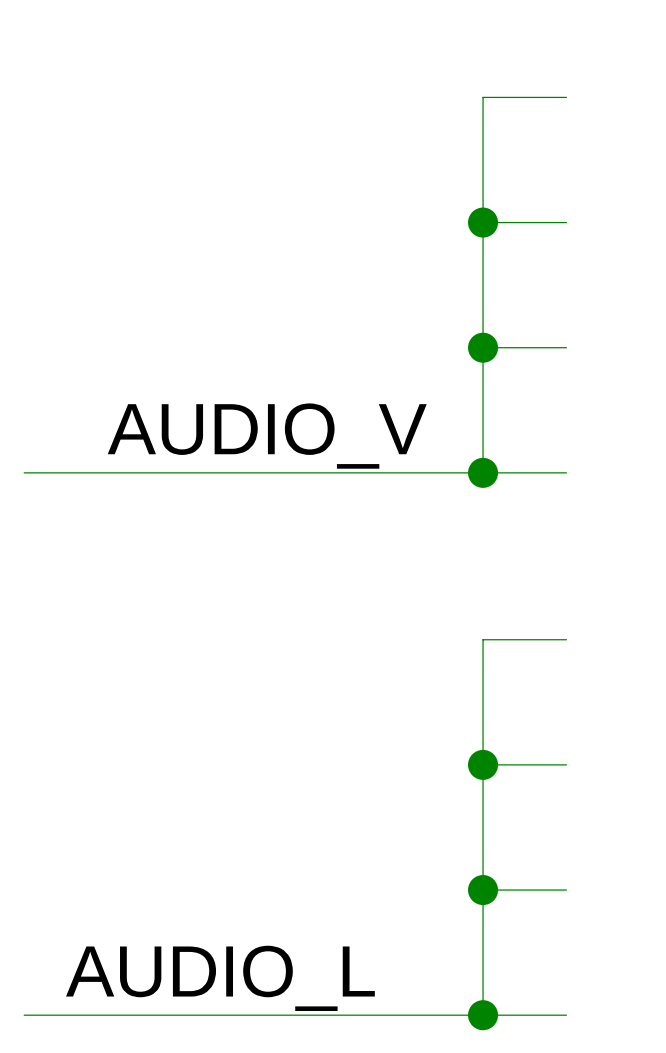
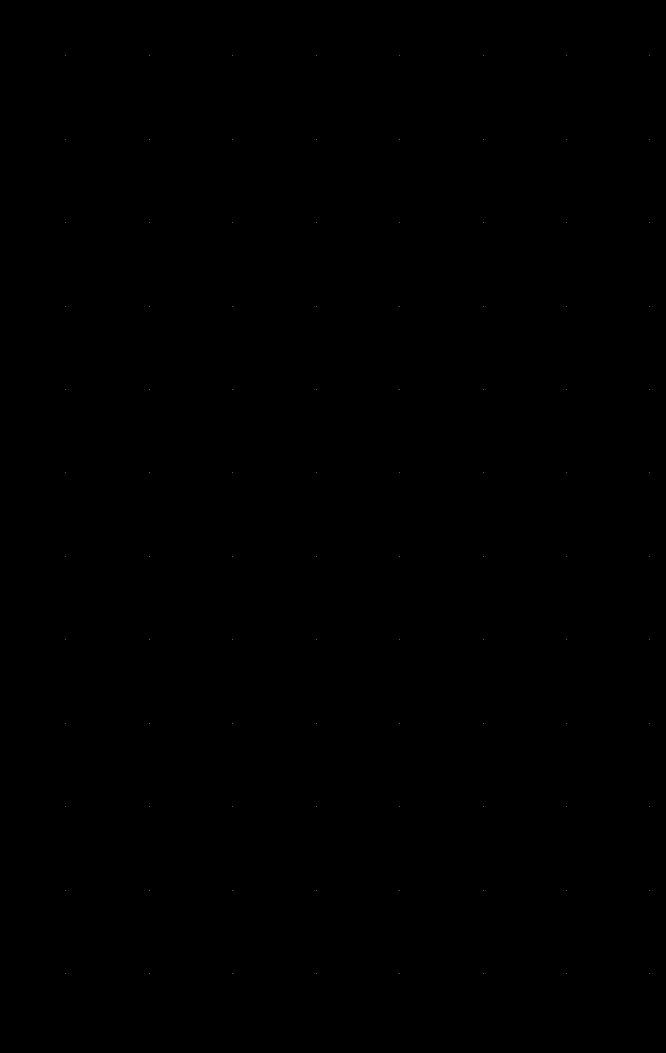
wire: (566, 97) (483, 97) (483, 472) -> none
wire: (483, 222) (566, 222) -> none
junction: (483, 222) -> none
wire: (483, 347) (566, 347) -> none
junction: (483, 347) -> none
label: AUDIO_V (267, 436) -> none
wire: (24, 472) (566, 472) -> none
junction: (483, 472) -> none
wire: (566, 639) (483, 639) (483, 1015) -> none
wire: (483, 764) (566, 764) -> none
junction: (483, 764) -> none
wire: (483, 890) (566, 890) -> none
junction: (483, 890) -> none
label: AUDIO_L (220, 978) -> none
wire: (24, 1015) (566, 1015) -> none
junction: (483, 1015) -> none

